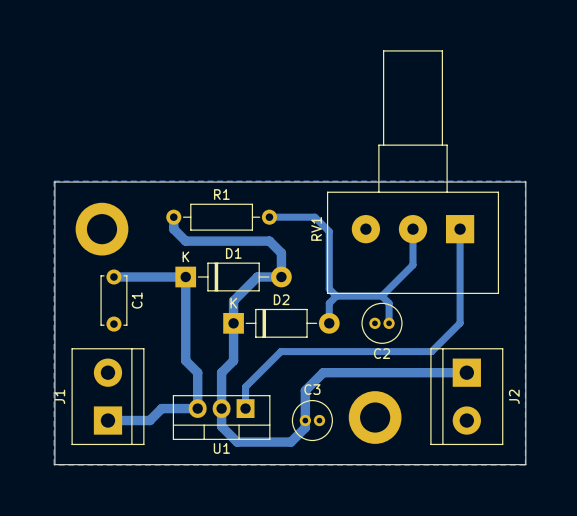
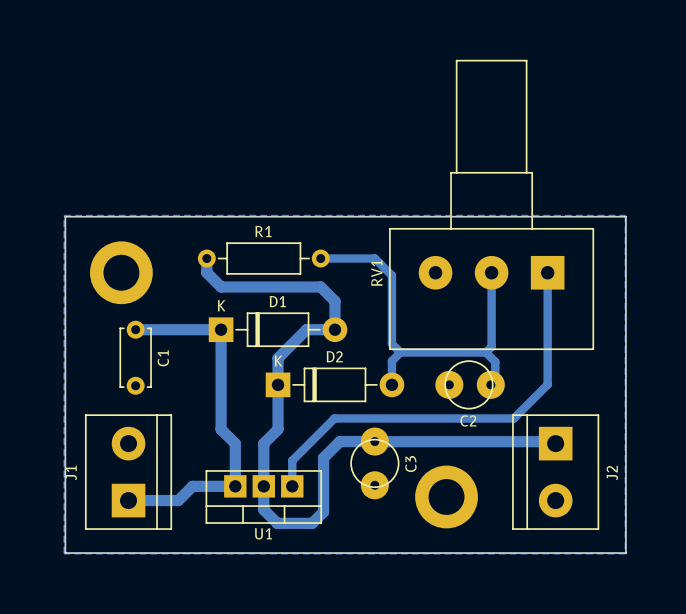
bottom track: (413, 265) (381, 296) (389, 303) (389, 323) -> (491, 315) (491, 346) (485, 352)
bottom track: none -> (454, 352) (485, 352)
bottom track: none -> (485, 352) (495, 361) (495, 384)
C2 footprint: [361, 302, 403, 344] -> [435, 360, 505, 410]
bottom track: none -> (366, 441) (339, 441) (323, 457) (323, 511) (312, 523) (277, 523) (263, 507)
bottom track: (466, 372) (323, 372) (305, 390) (305, 427) (290, 442) (237, 442) (221, 426) -> (555, 443) (553, 441) (365, 441)
C3 name position: C3 (312, 389) -> C3 (410, 463)
U1 footprint: [172, 395, 271, 440] -> [205, 470, 322, 524]
C3 footprint: [291, 400, 333, 442] -> [350, 427, 400, 500]

